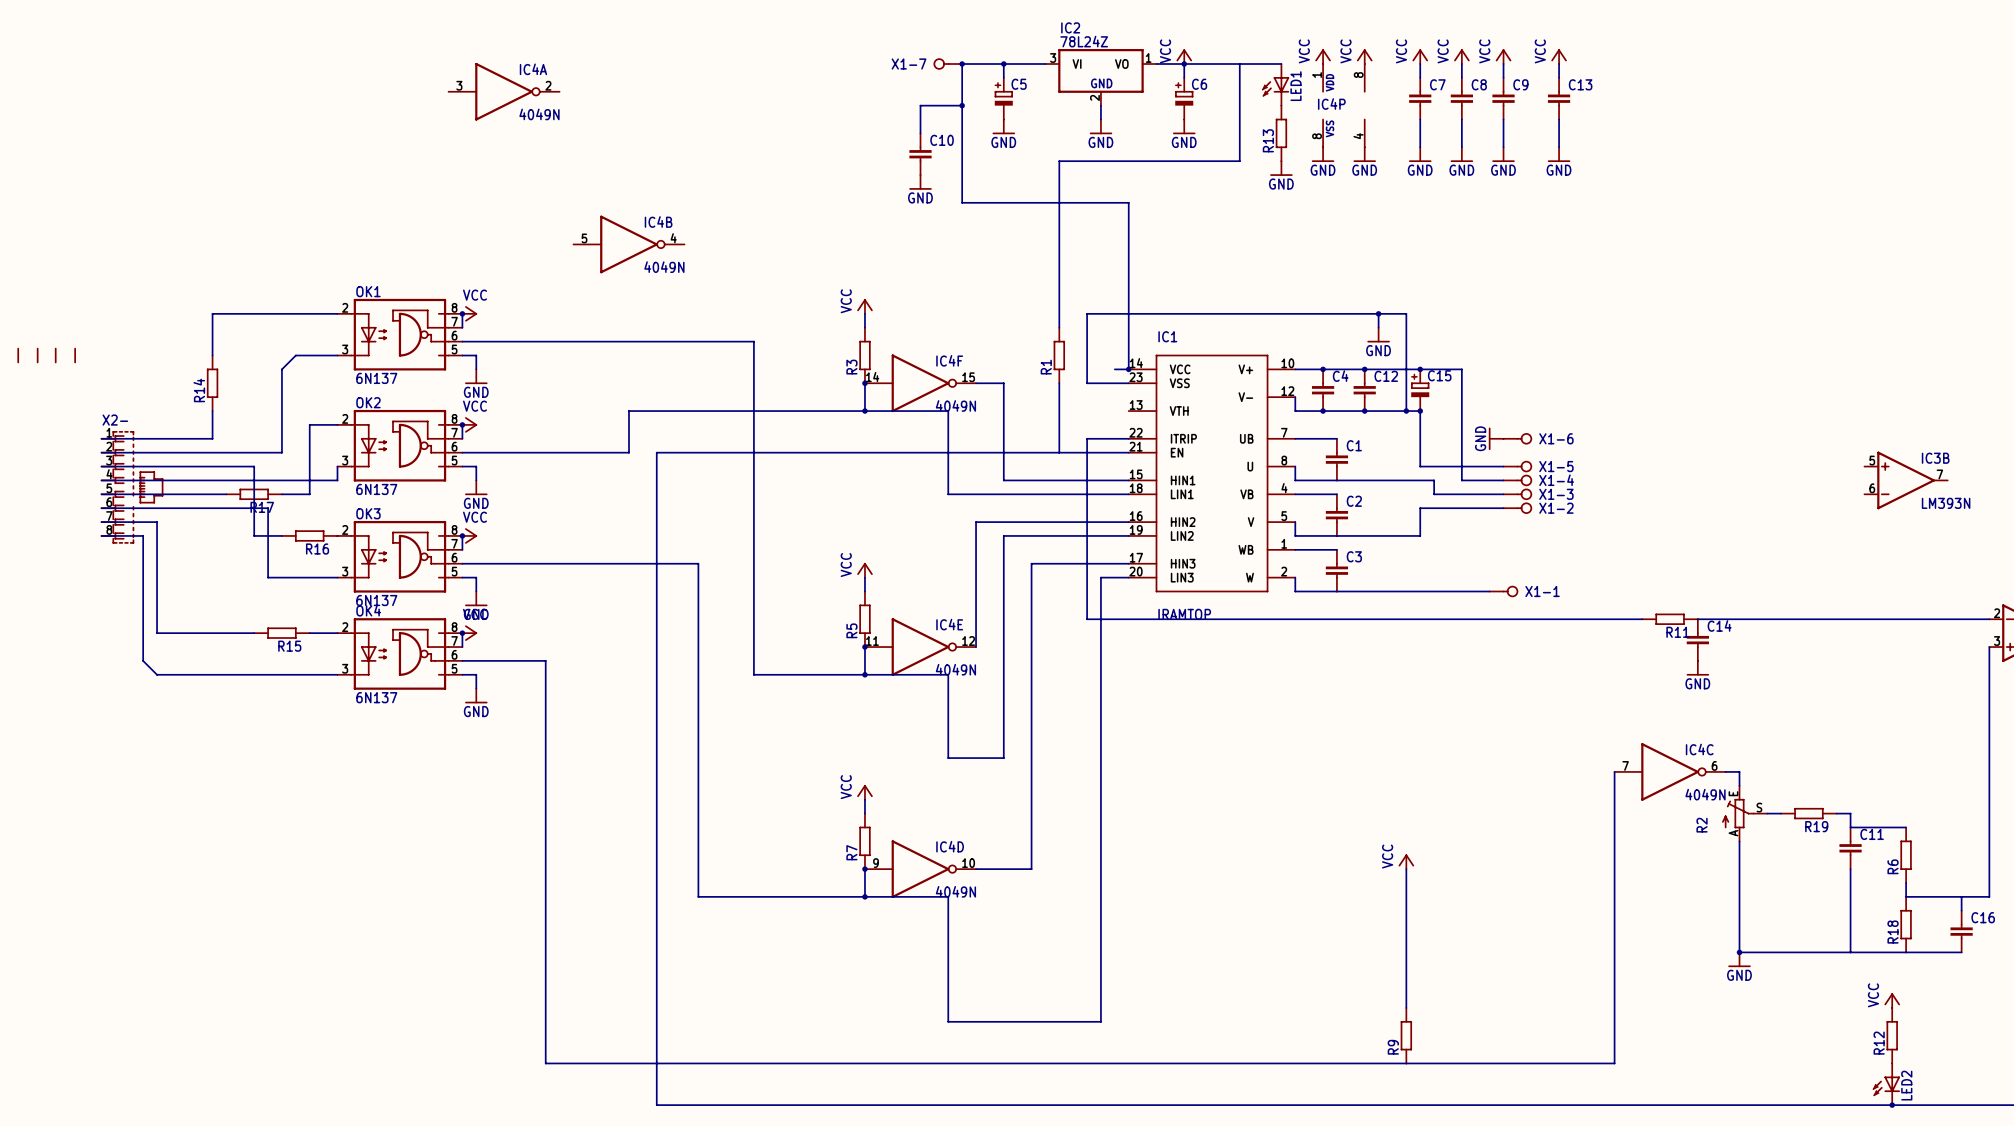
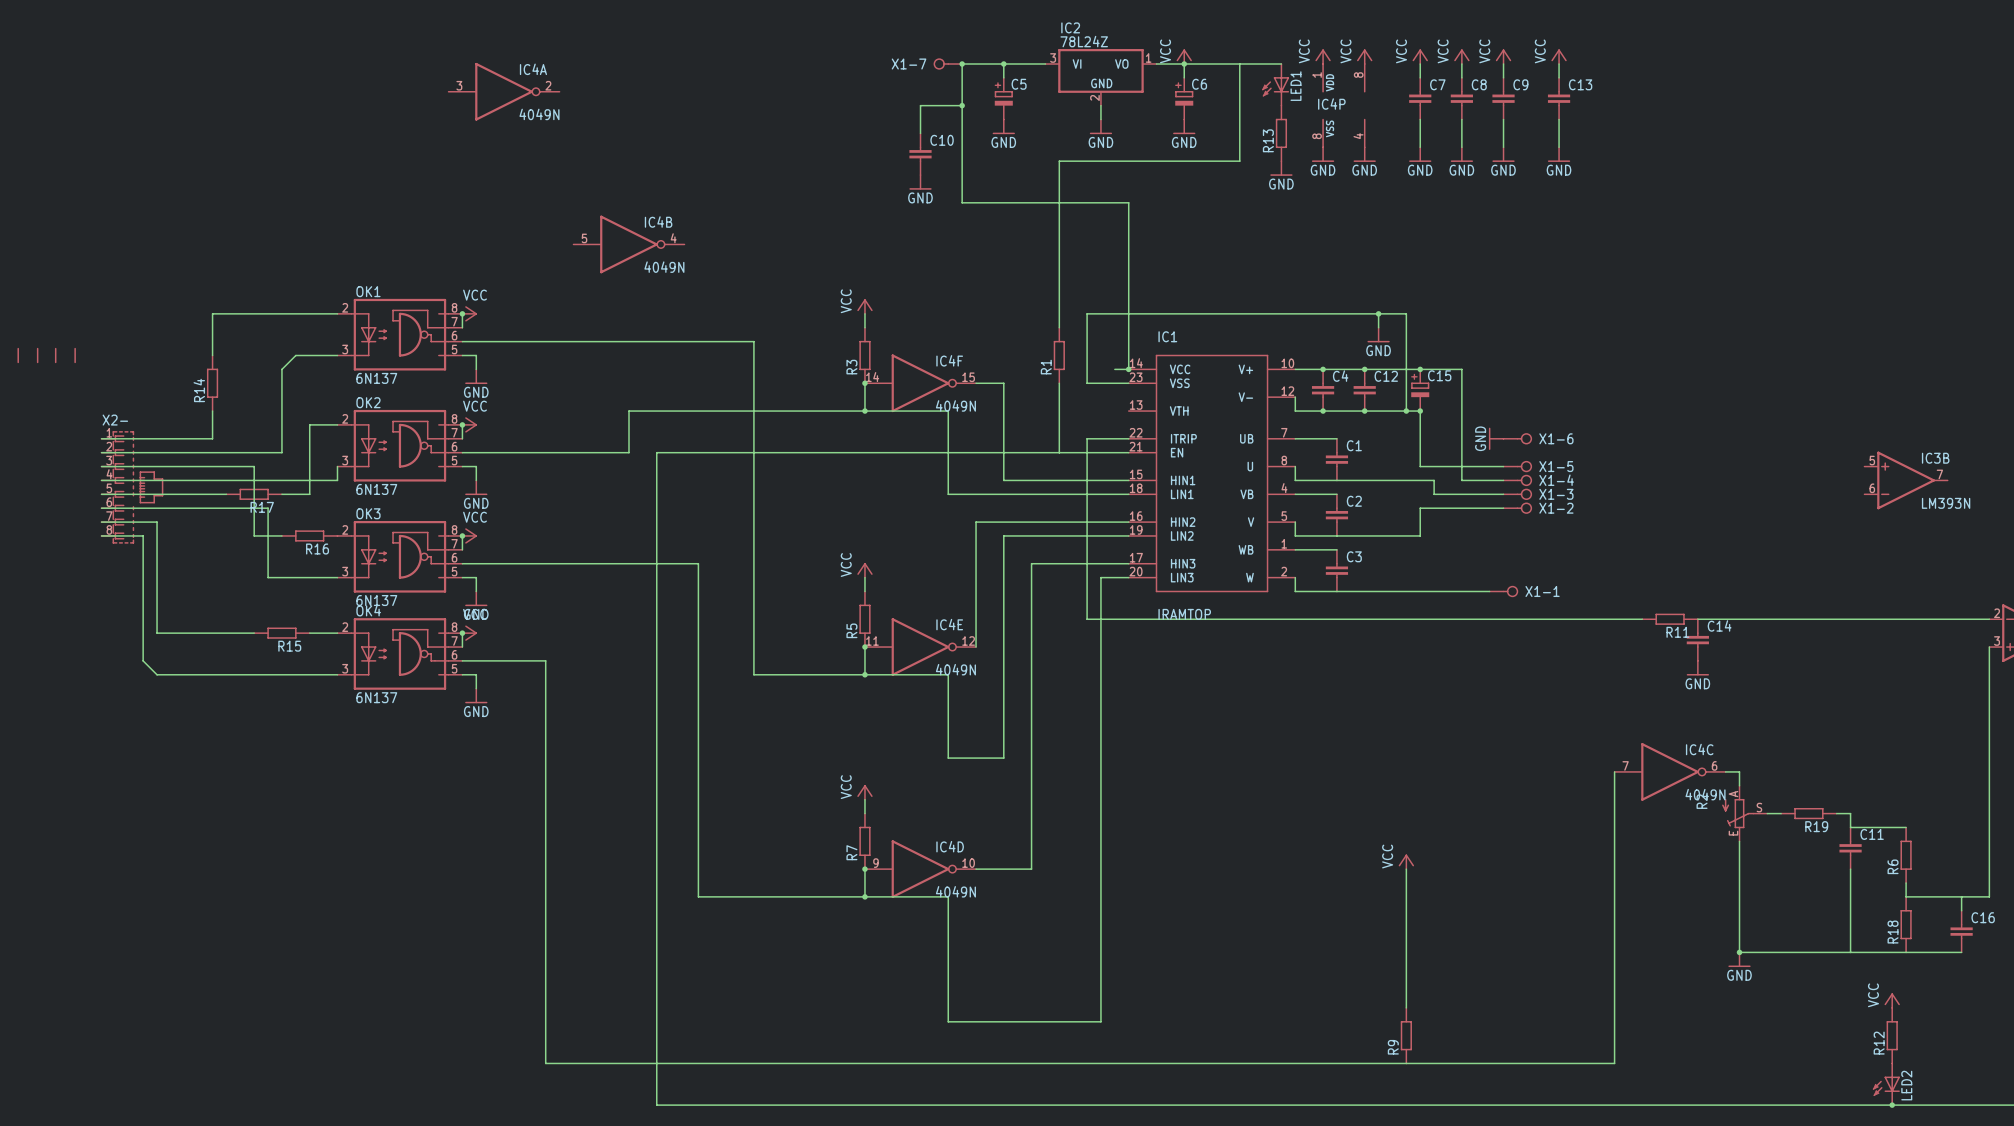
R2 flip: as is (1738, 813) -> up-down (1738, 813)

